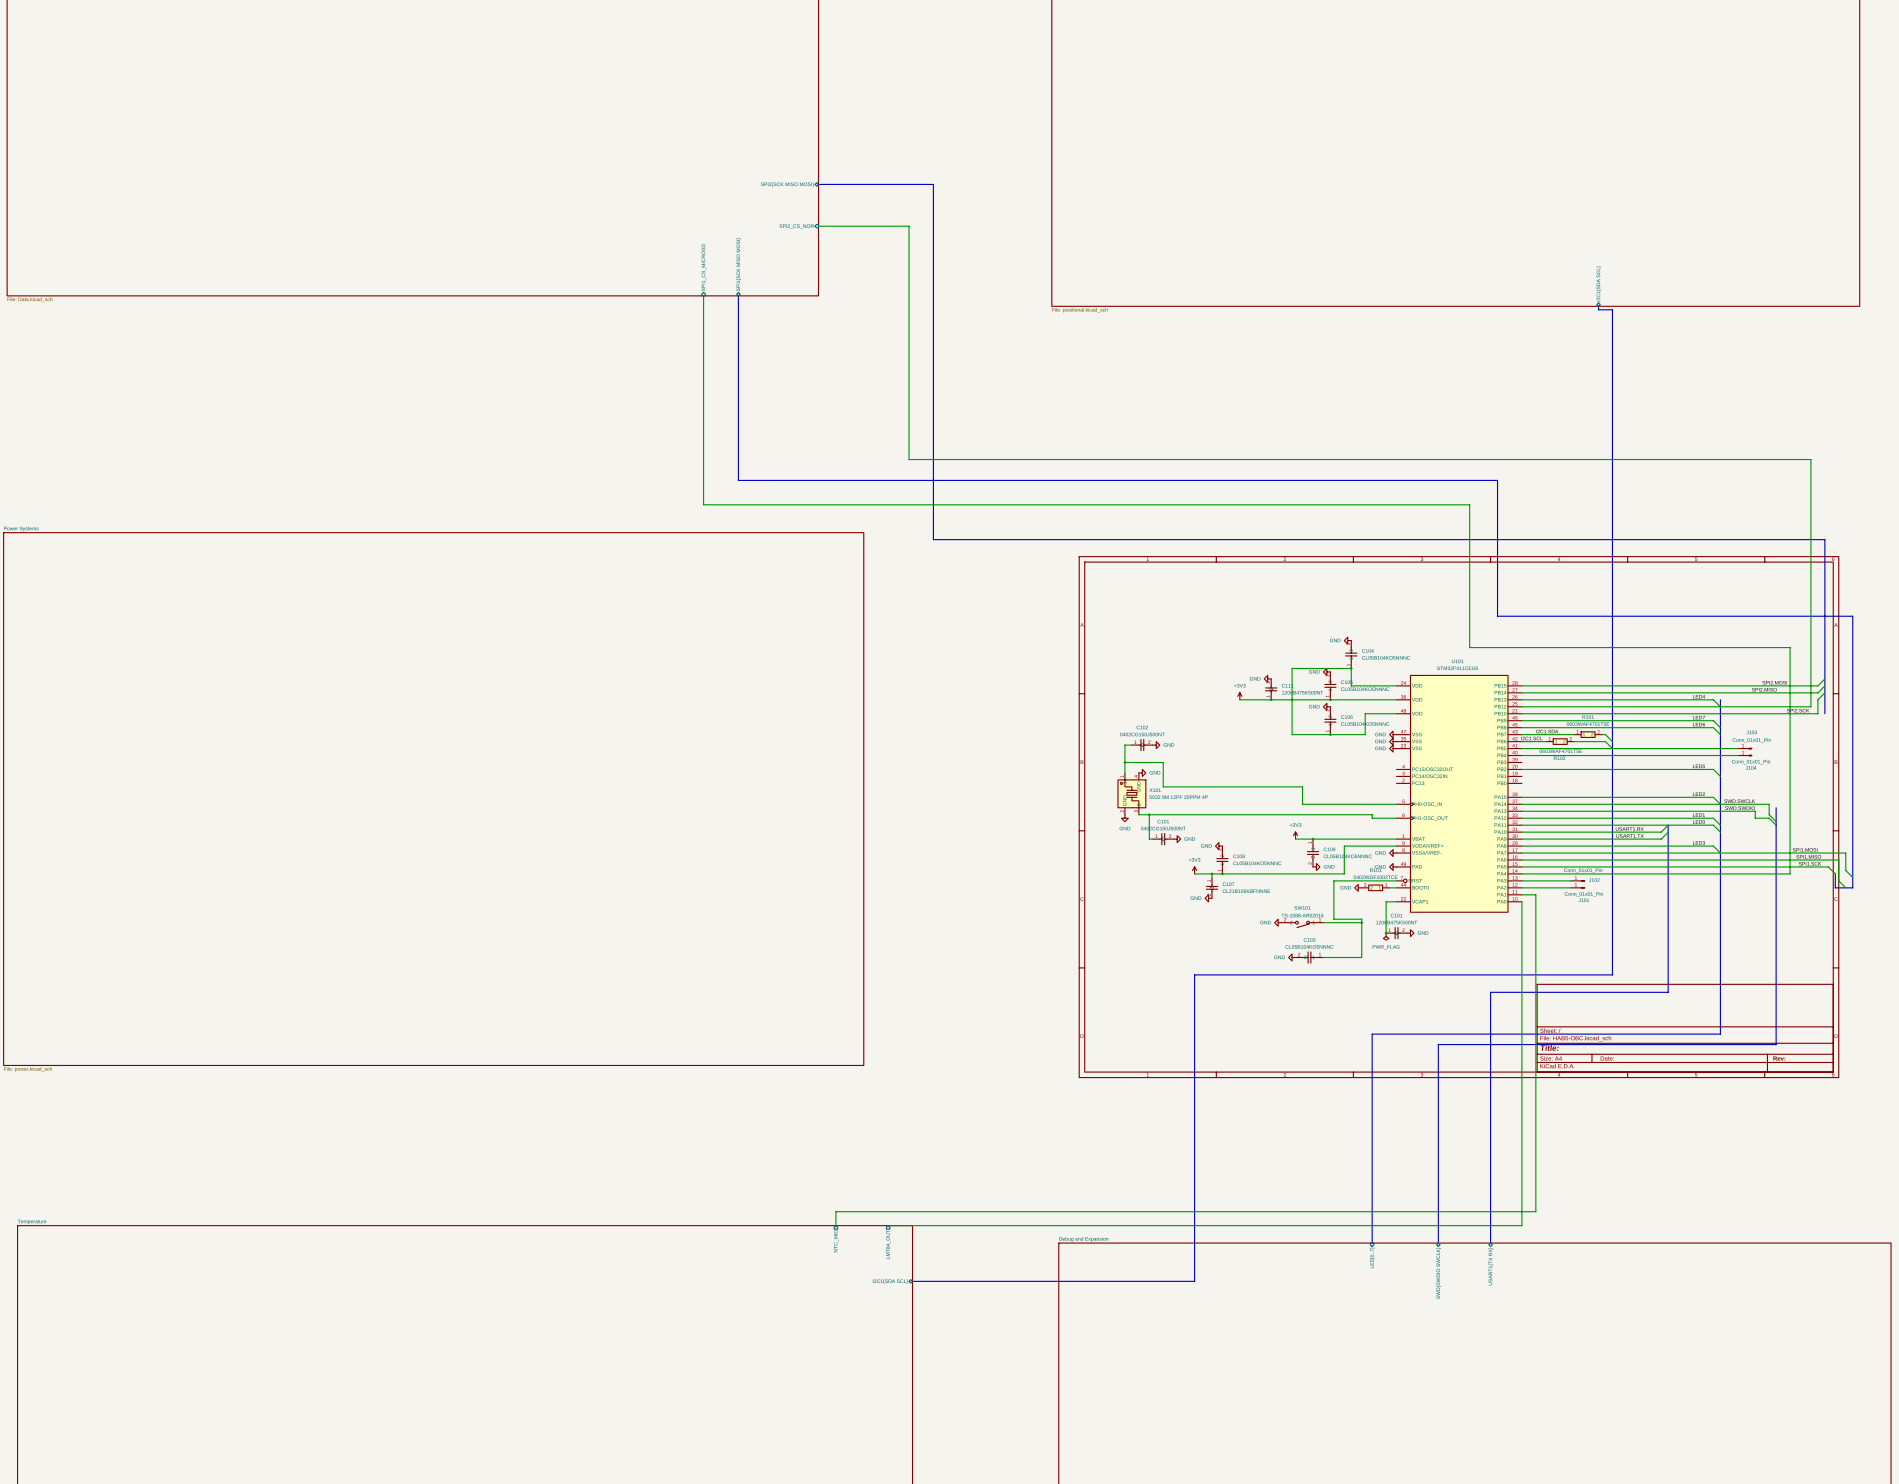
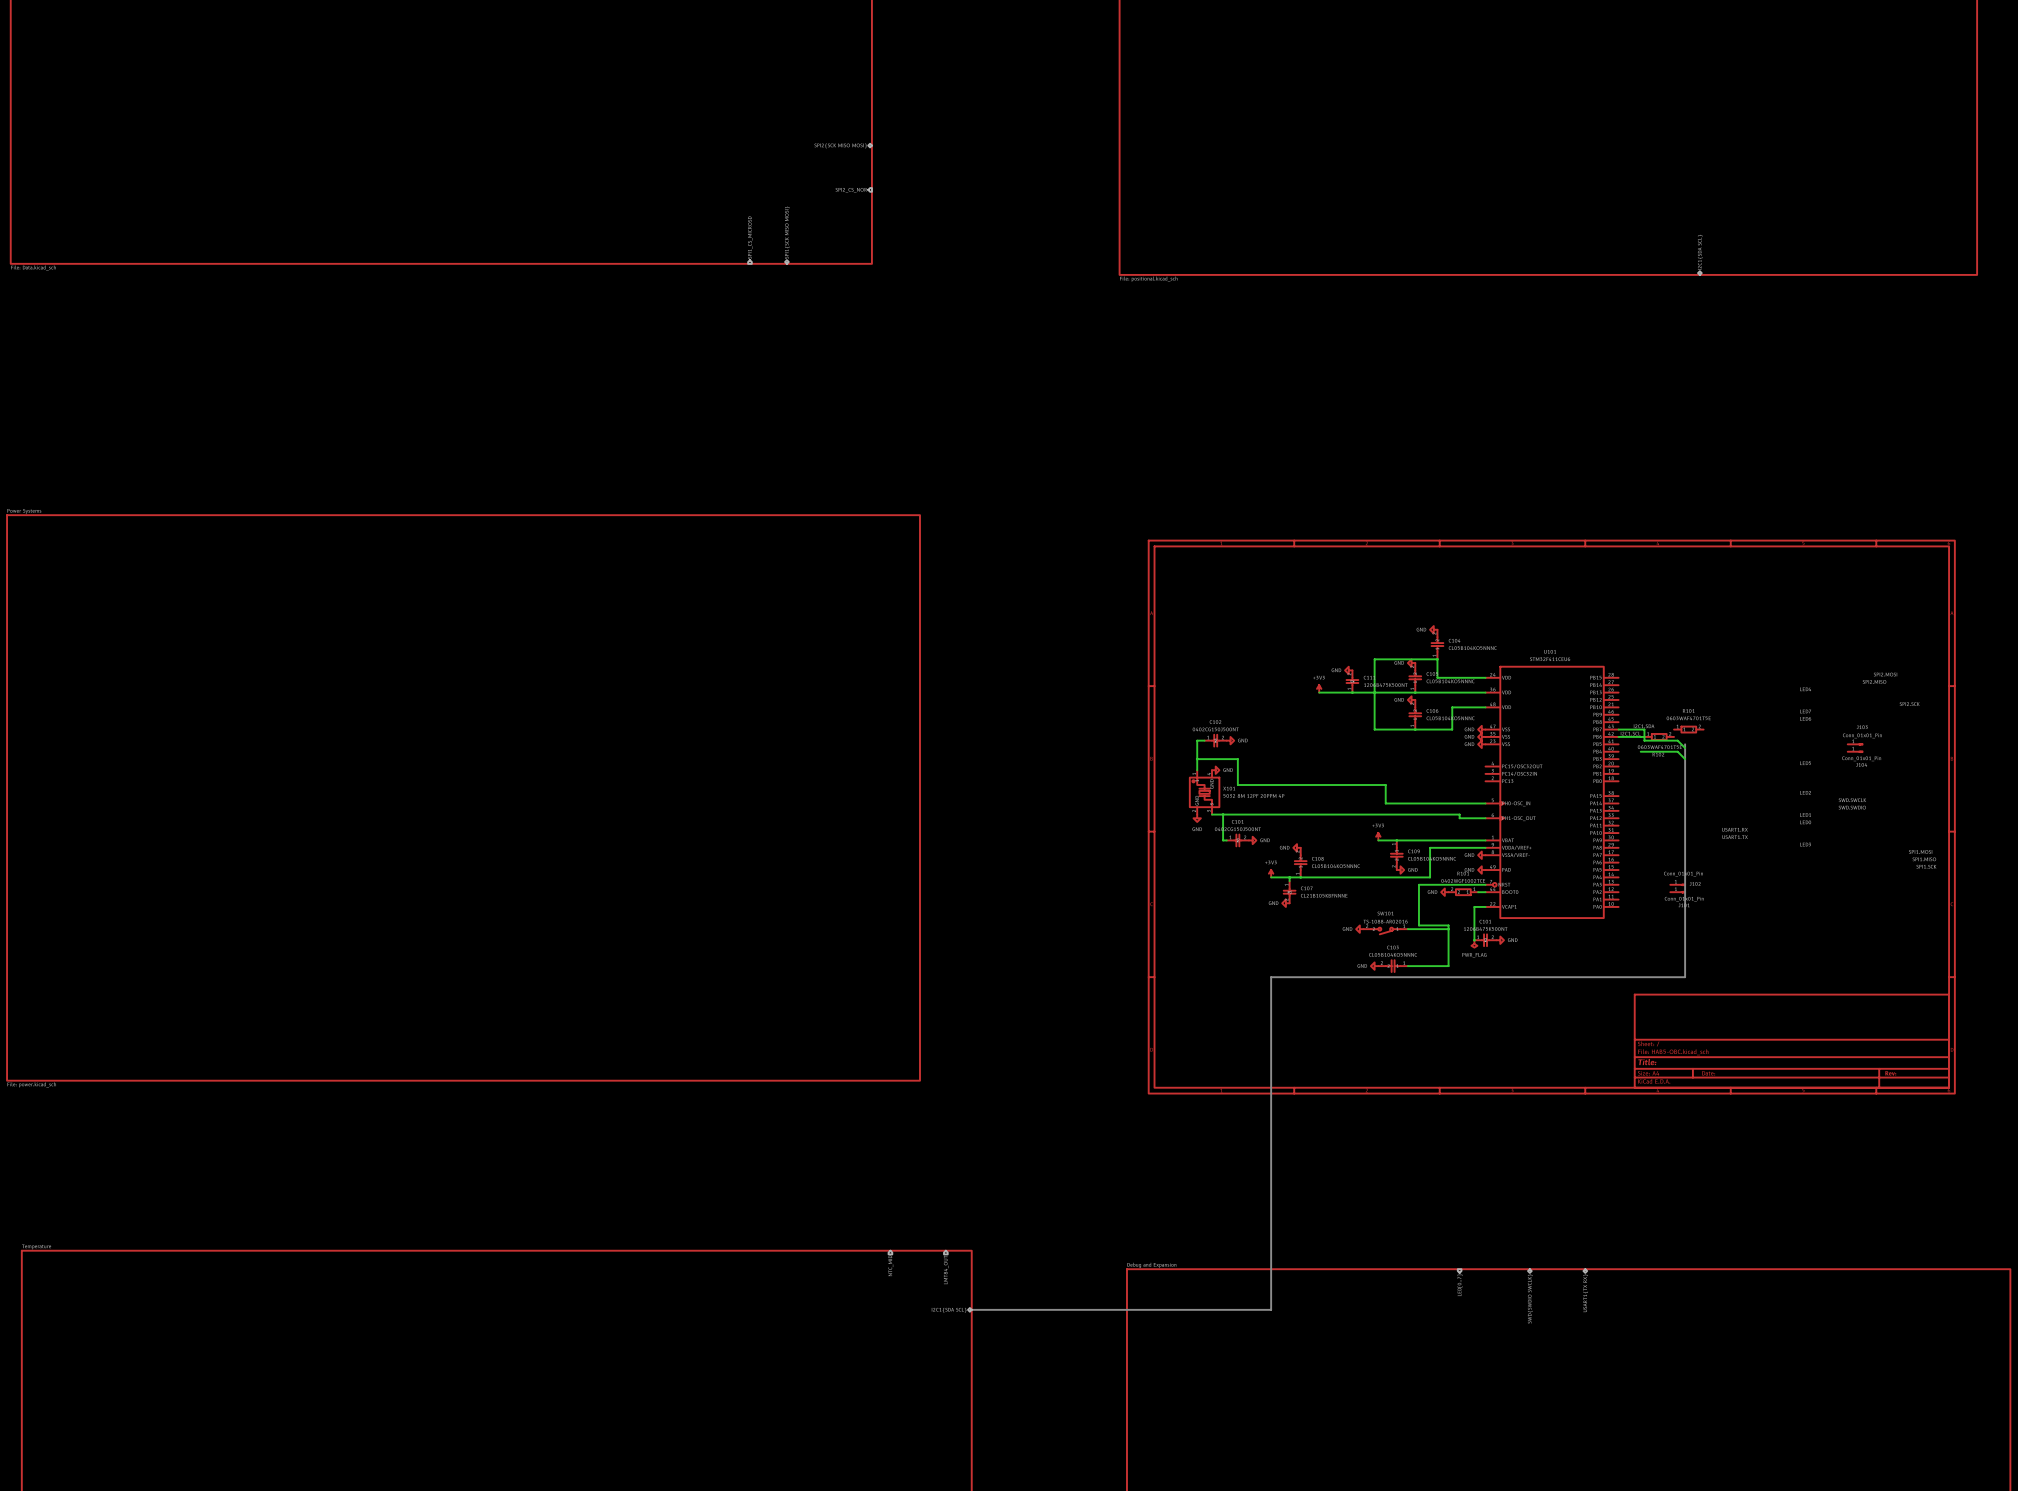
bus: (818, 184) (933, 184) (933, 539) (1824, 539) (1824, 713) -> none
wire: (818, 226) (909, 226) (909, 459) (1810, 459) (1810, 706) (1521, 706) -> none
wire: (703, 295) (703, 504) (1469, 504) (1469, 647) (1790, 647) (1790, 873) (1521, 873) -> none
bus: (738, 295) (738, 480) (1497, 480) (1497, 616) (1852, 616) (1852, 887) (1835, 887) (1835, 873) -> none
bus: (1598, 306) (1598, 309) (1612, 309) (1612, 974) (1194, 974) -> (1685, 744) (1685, 977) (1271, 977) (1271, 984)
wire: (1824, 678) (1817, 685) (1521, 685) -> none
wire: (1824, 685) (1817, 692) (1521, 692) -> none
wire: (1824, 692) (1817, 699) (1817, 713) (1521, 713) -> none
wire: (1521, 699) (1713, 699) (1720, 706) -> none
bus: (1720, 699) (1720, 1034) (1372, 1034) (1372, 1243) -> none
wire: (1521, 720) (1713, 720) (1720, 727) -> none
wire: (1521, 727) (1713, 727) (1720, 734) -> none
wire: (1546, 734) (1574, 734) -> (1644, 729) (1644, 740) (1677, 740) (1685, 748)
wire: (1602, 734) (1605, 734) (1612, 741) -> none
wire: (1574, 741) (1605, 741) (1612, 748) -> none
wire: (1521, 748) (1737, 748) -> none
wire: (1521, 755) (1542, 755) -> none
wire: (1577, 755) (1737, 755) -> (1677, 751) (1685, 759)
wire: (1521, 769) (1713, 769) (1720, 776) -> none
wire: (1521, 797) (1713, 797) (1720, 804) -> none
wire: (1521, 804) (1769, 804) (1769, 814) (1776, 821) -> none
bus: (1776, 807) (1776, 1044) (1438, 1044) (1438, 1243) -> none
wire: (1521, 811) (1755, 811) (1755, 818) (1769, 818) (1776, 825) -> none
wire: (1521, 818) (1713, 818) (1720, 825) -> none
wire: (1521, 825) (1713, 825) (1720, 832) -> none
wire: (1668, 825) (1661, 832) (1521, 832) -> none
bus: (1668, 825) (1668, 992) (1490, 992) (1490, 1243) -> none
wire: (1668, 832) (1661, 839) (1521, 839) -> none
wire: (1521, 846) (1713, 846) (1720, 853) -> none
wire: (1521, 853) (1845, 853) (1845, 870) (1852, 877) -> none
wire: (1521, 860) (1838, 860) (1838, 880) (1845, 887) -> none
wire: (1521, 866) (1828, 866) (1835, 873) -> none
wire: (1521, 880) (1570, 880) -> none
wire: (1521, 887) (1570, 887) -> none
wire: (1521, 894) (1535, 894) (1535, 1211) (835, 1211) (835, 1225) -> none
wire: (1521, 901) (1521, 1225) (888, 1225) -> none

